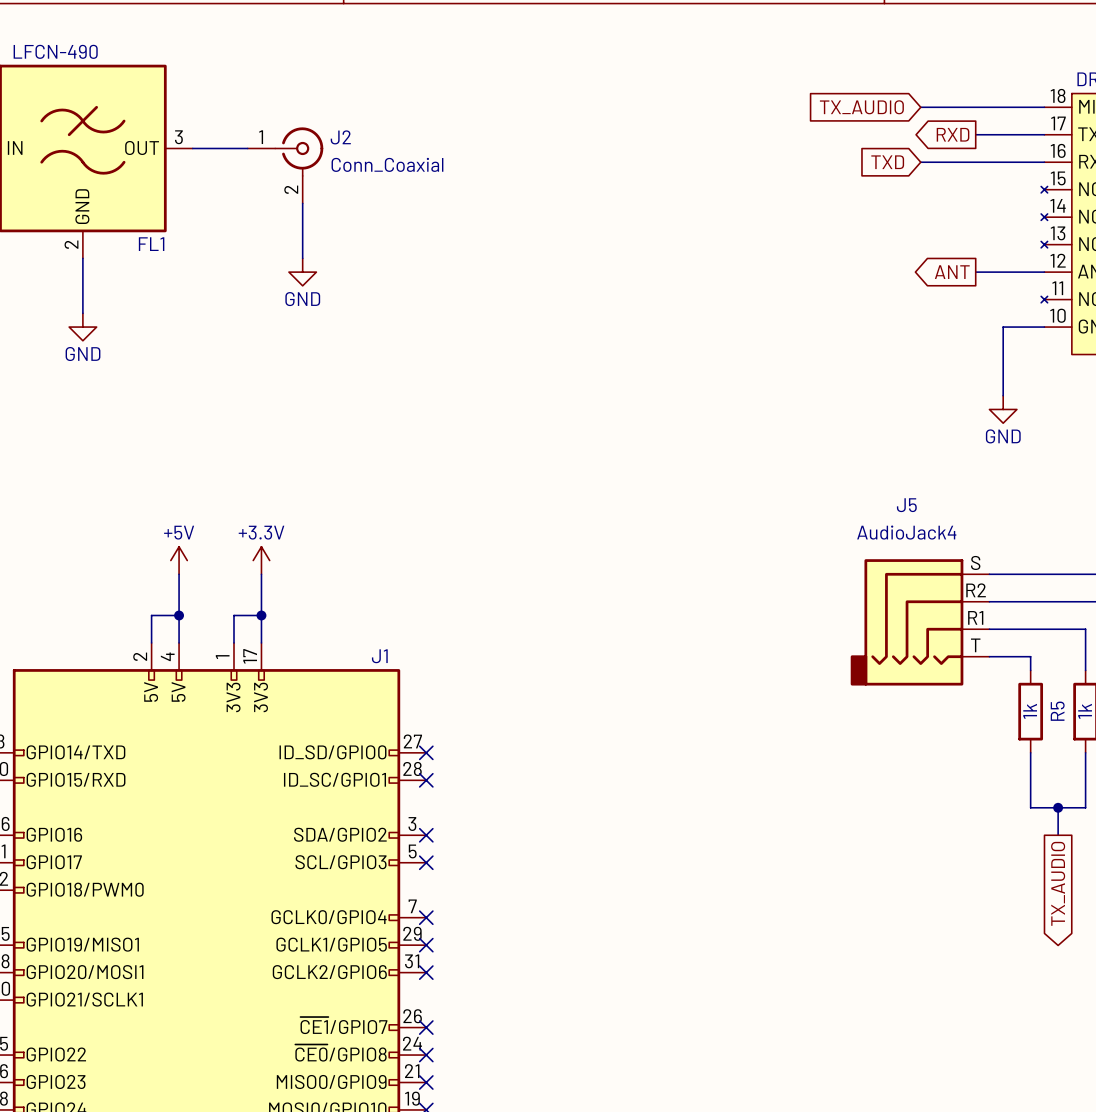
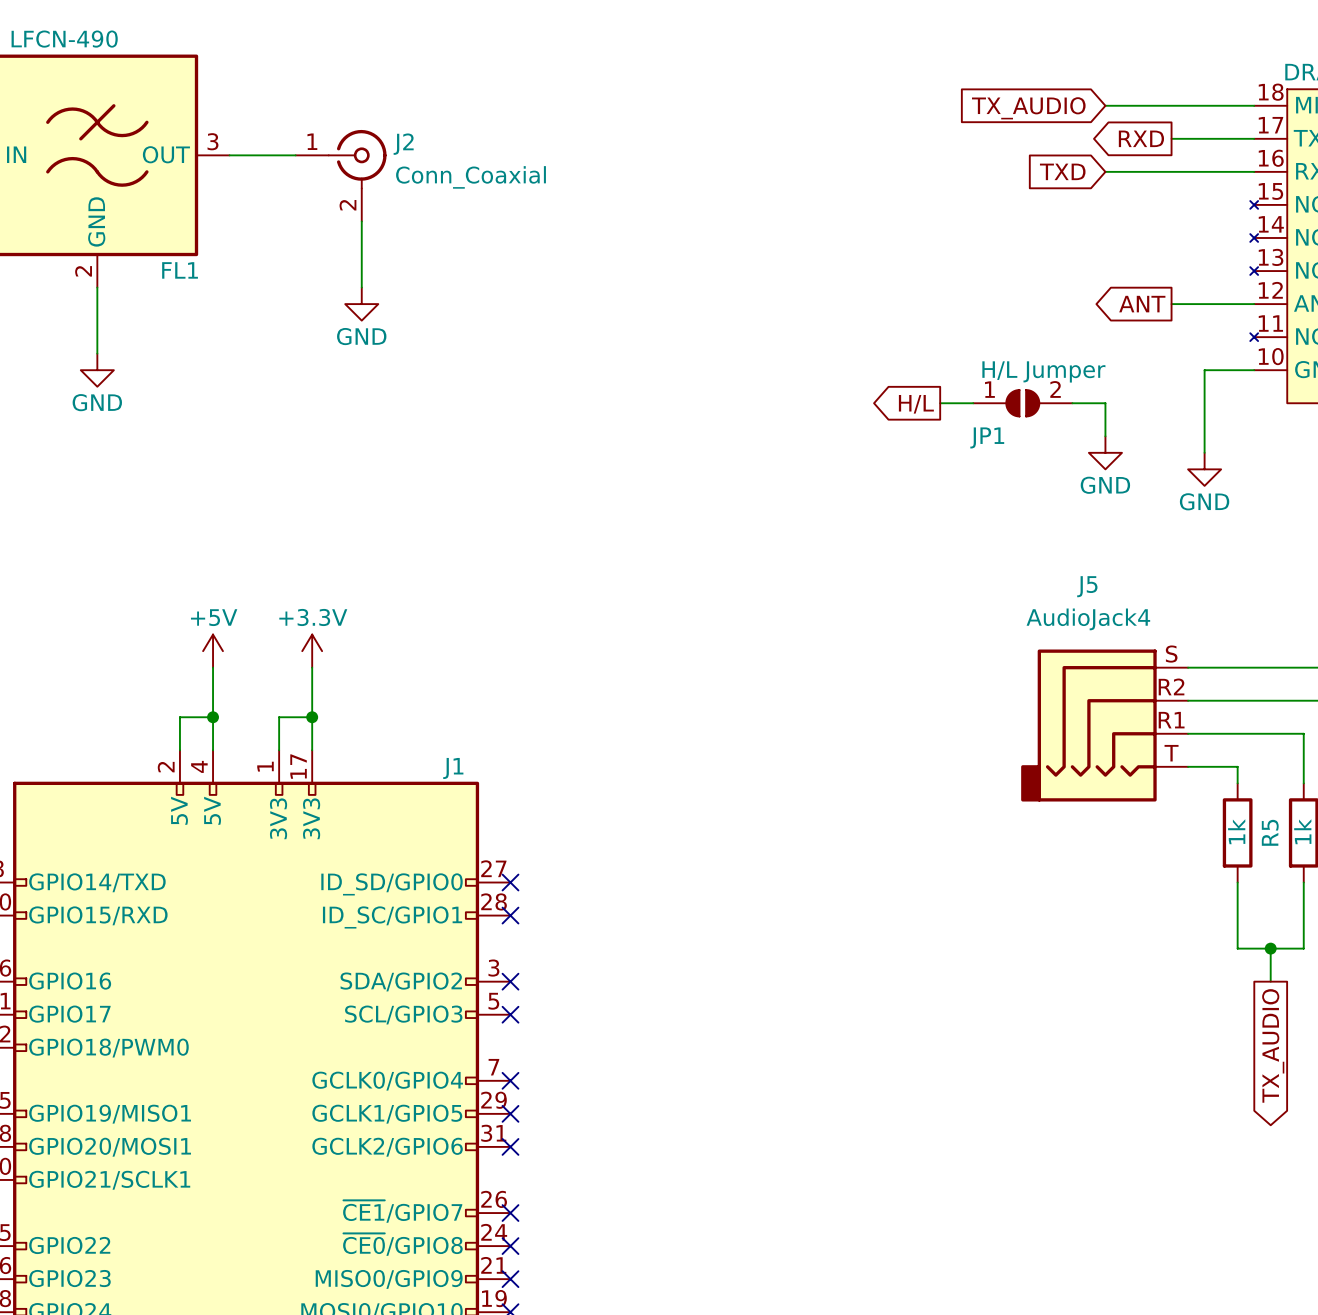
global label: none -> H/L (916, 404)
wire: none -> (940, 403) (973, 403)
JP1: none -> H/L Jumper (1022, 403)
wire: none -> (1072, 403) (1105, 403) (1105, 436)
power symbol: none -> GND (1105, 452)

